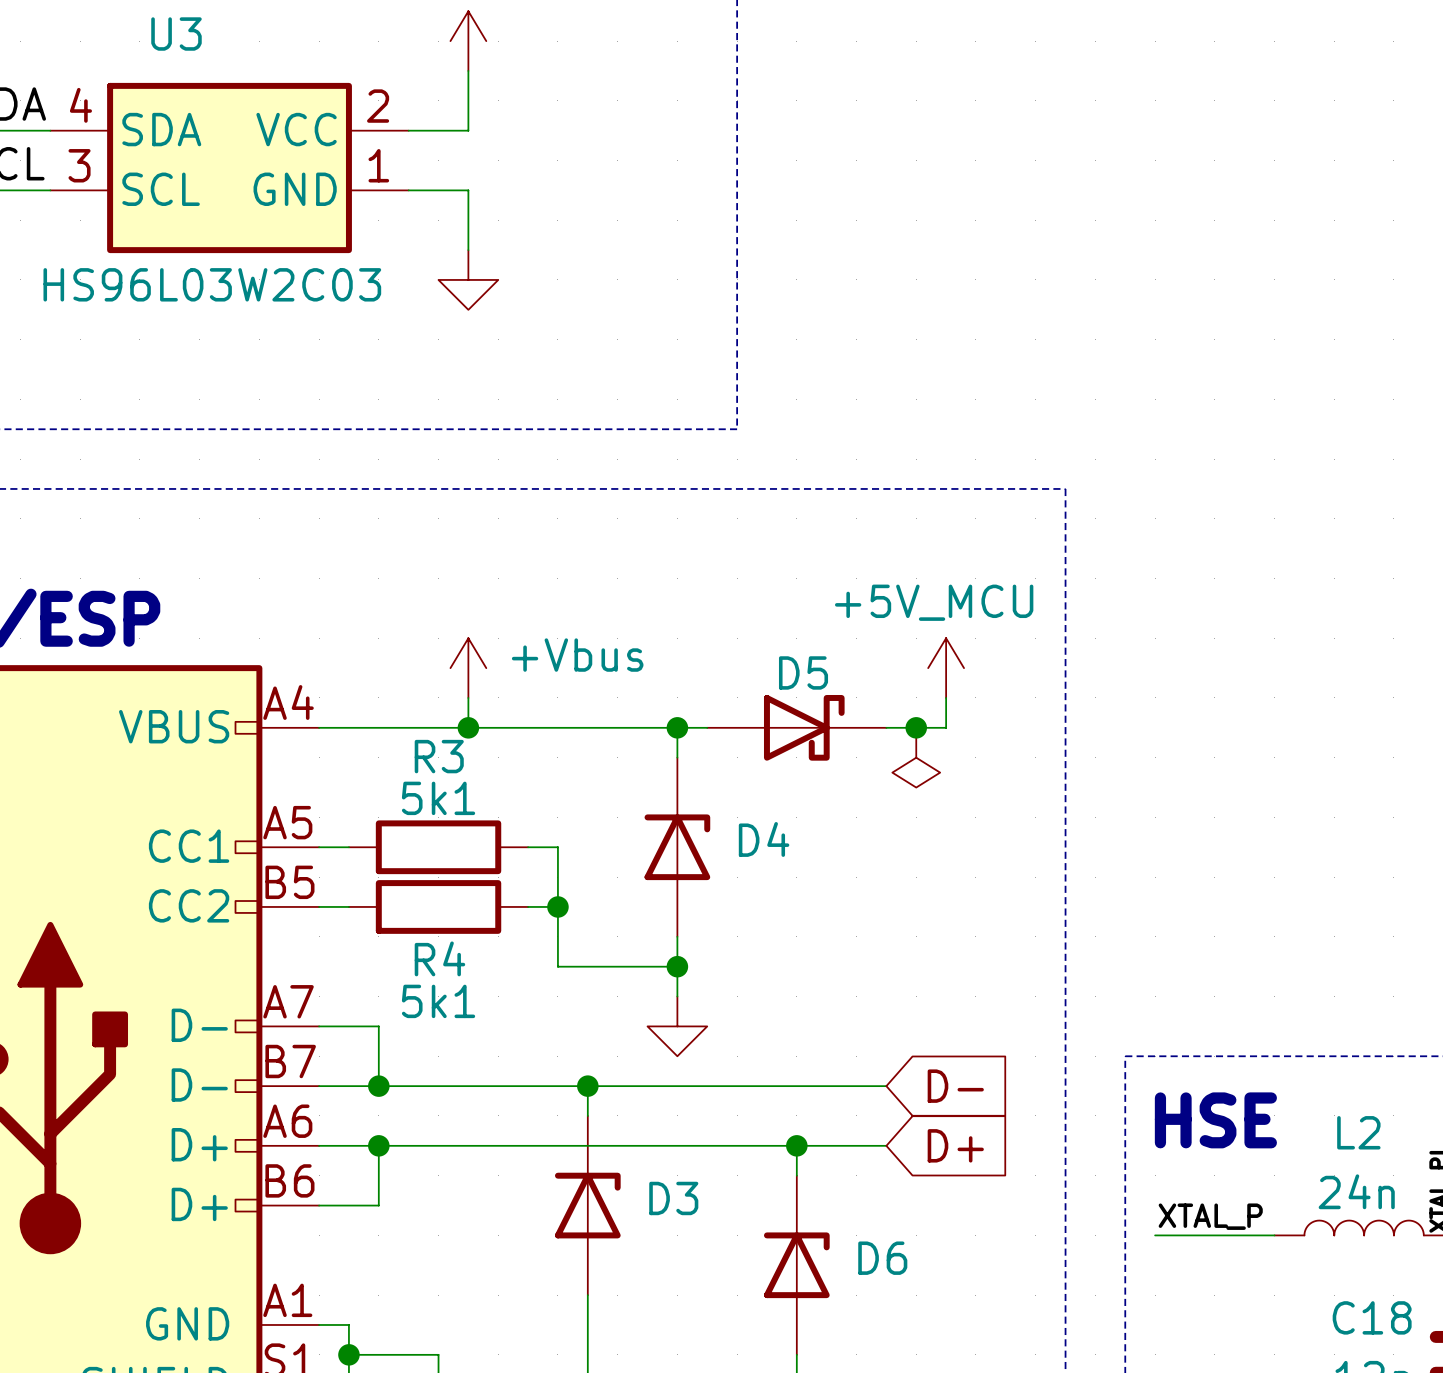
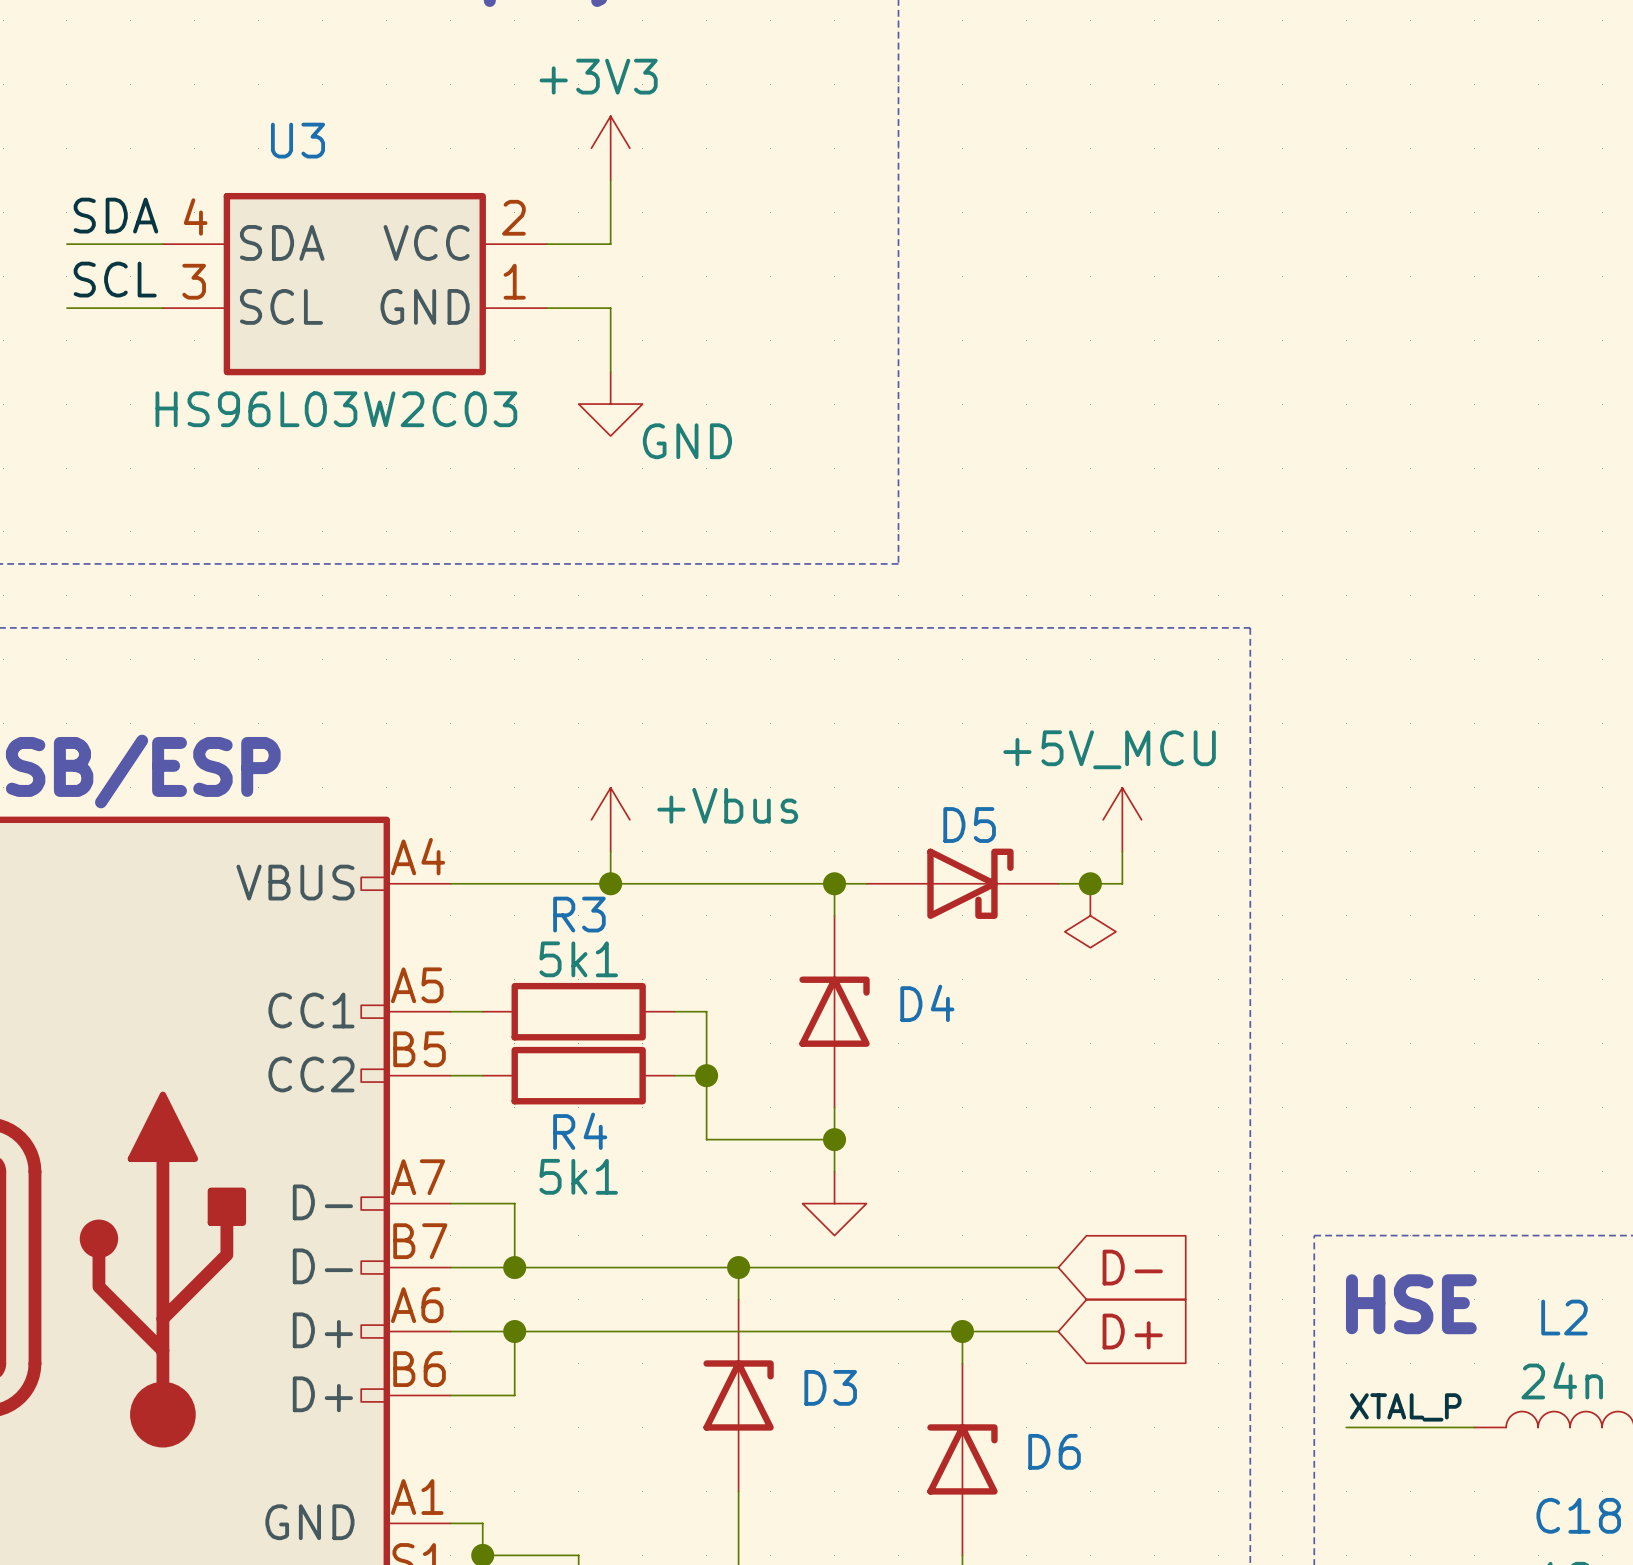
power symbol text: none -> GND (687, 441)

